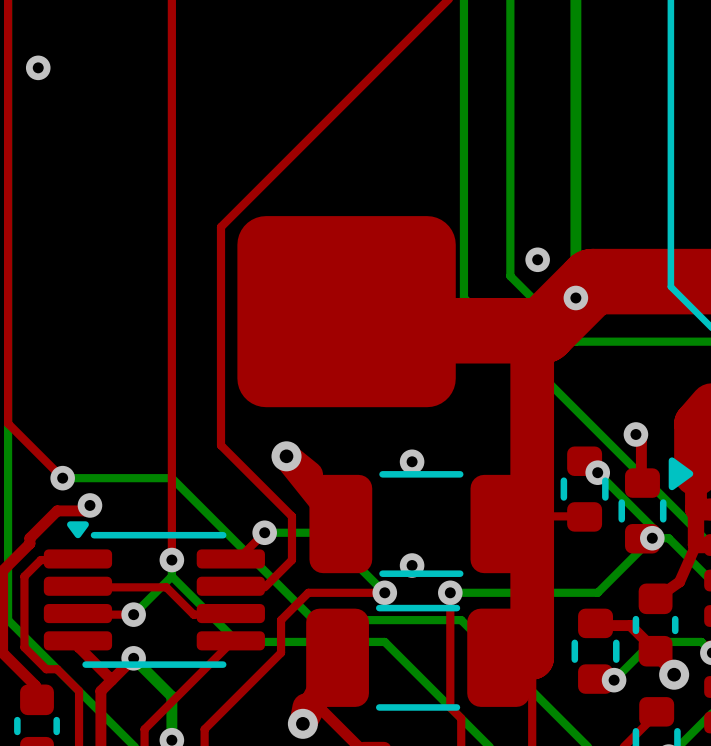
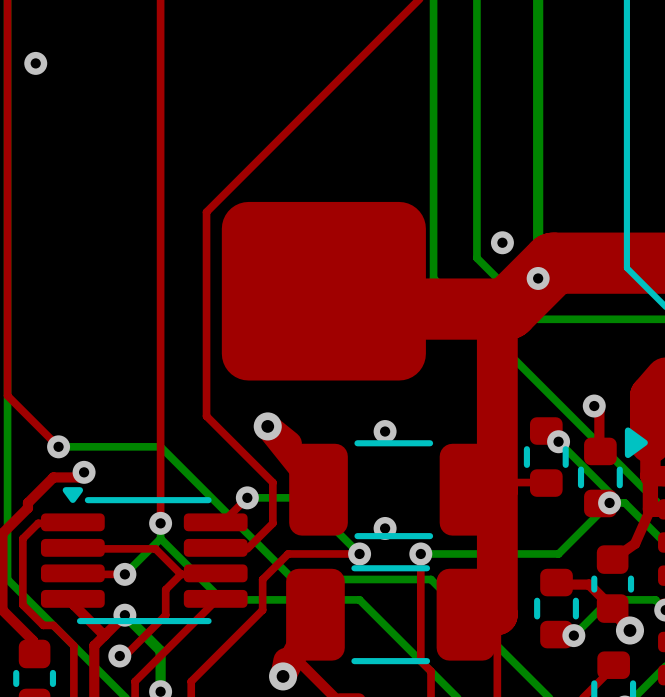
top track: none -> (181, 574) (165, 589) (165, 615) (124, 656)
via: none -> (119, 656)

